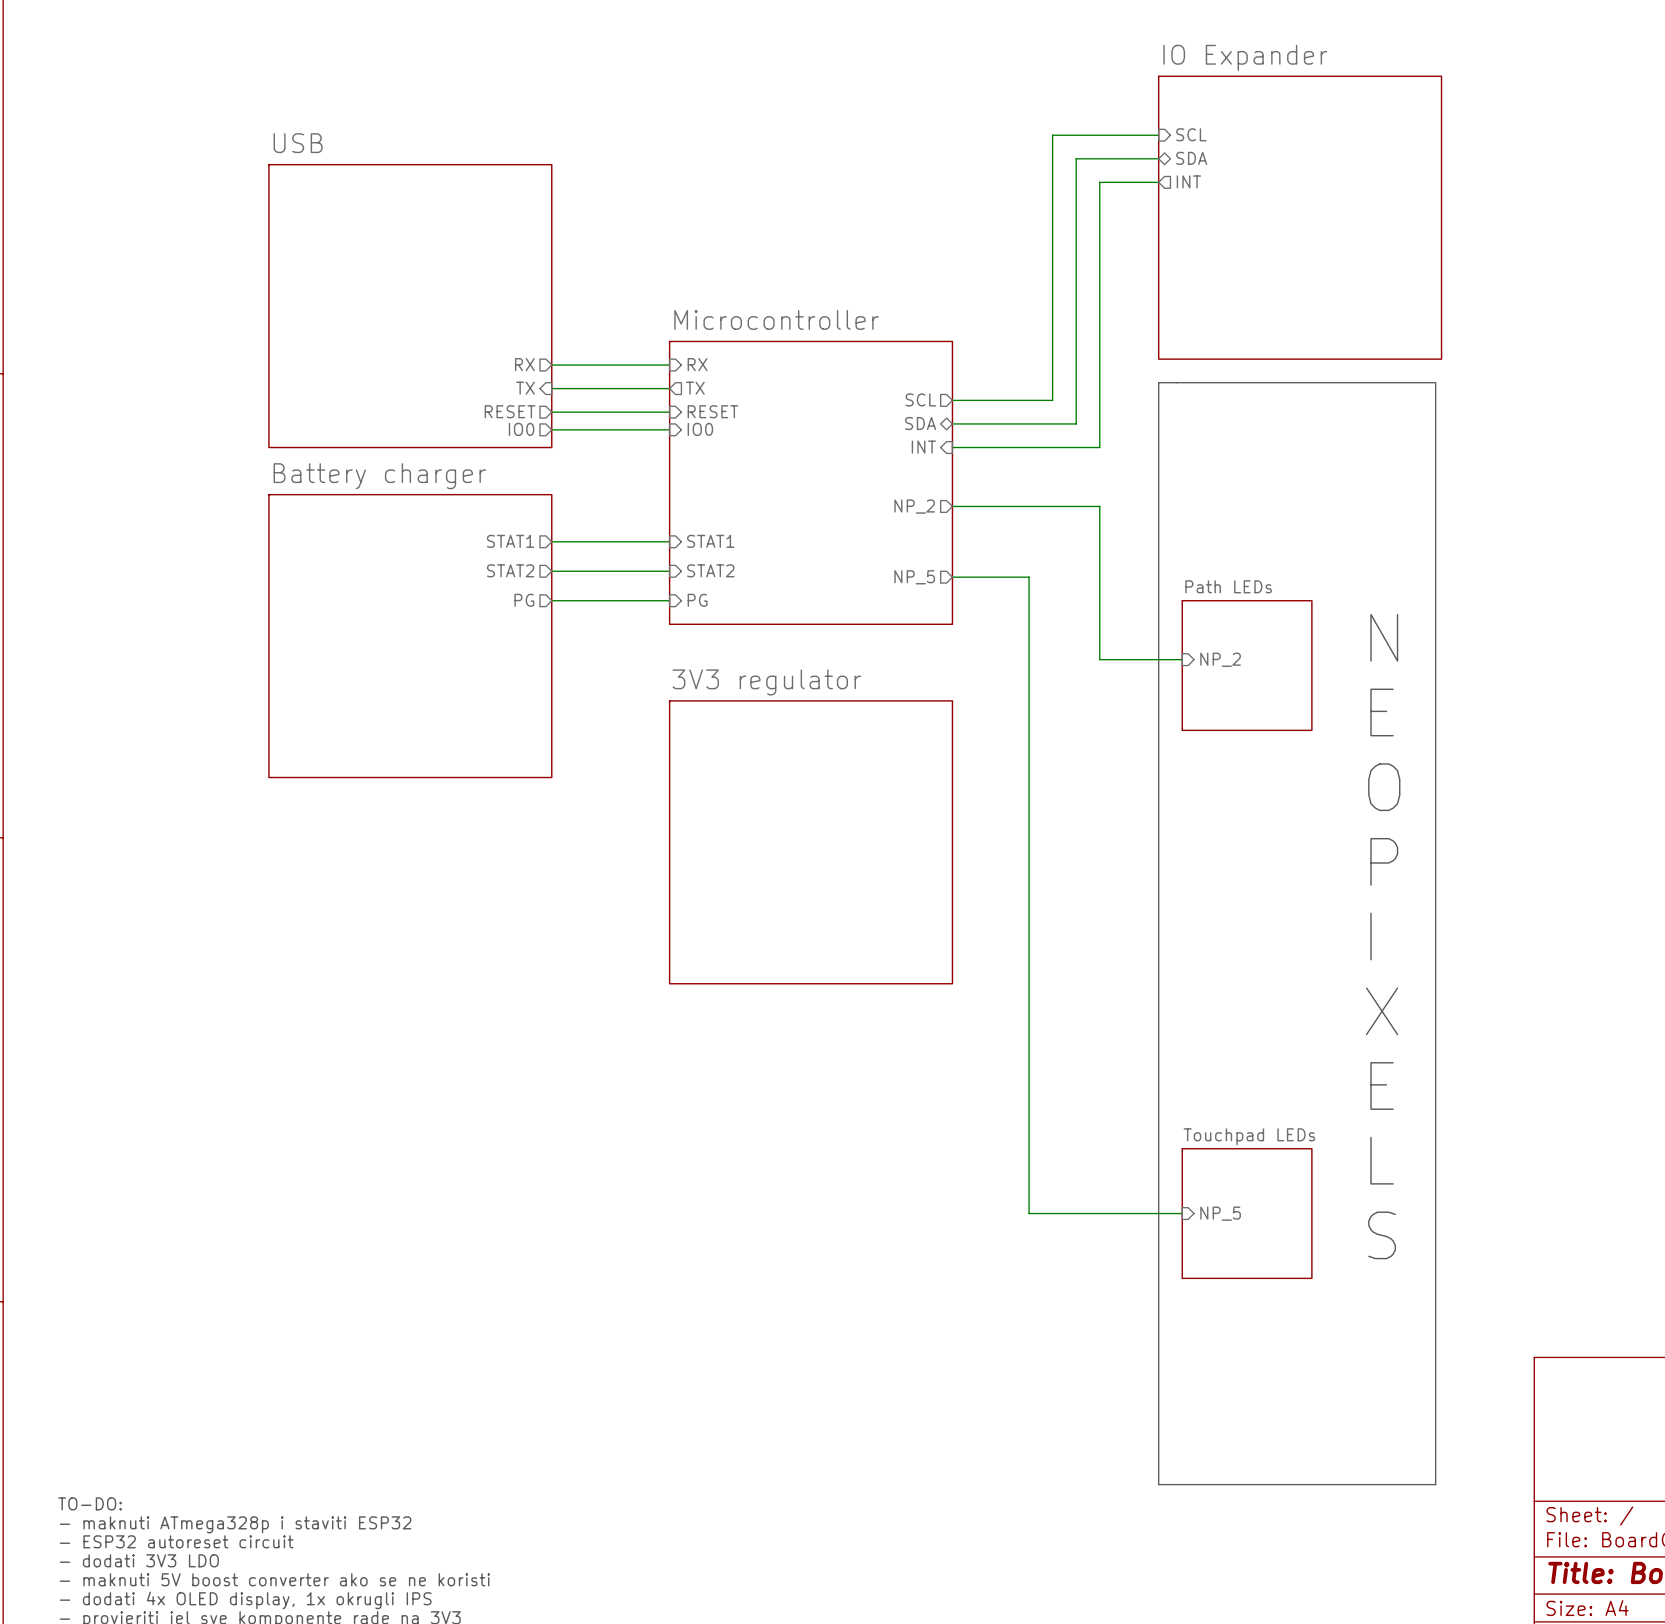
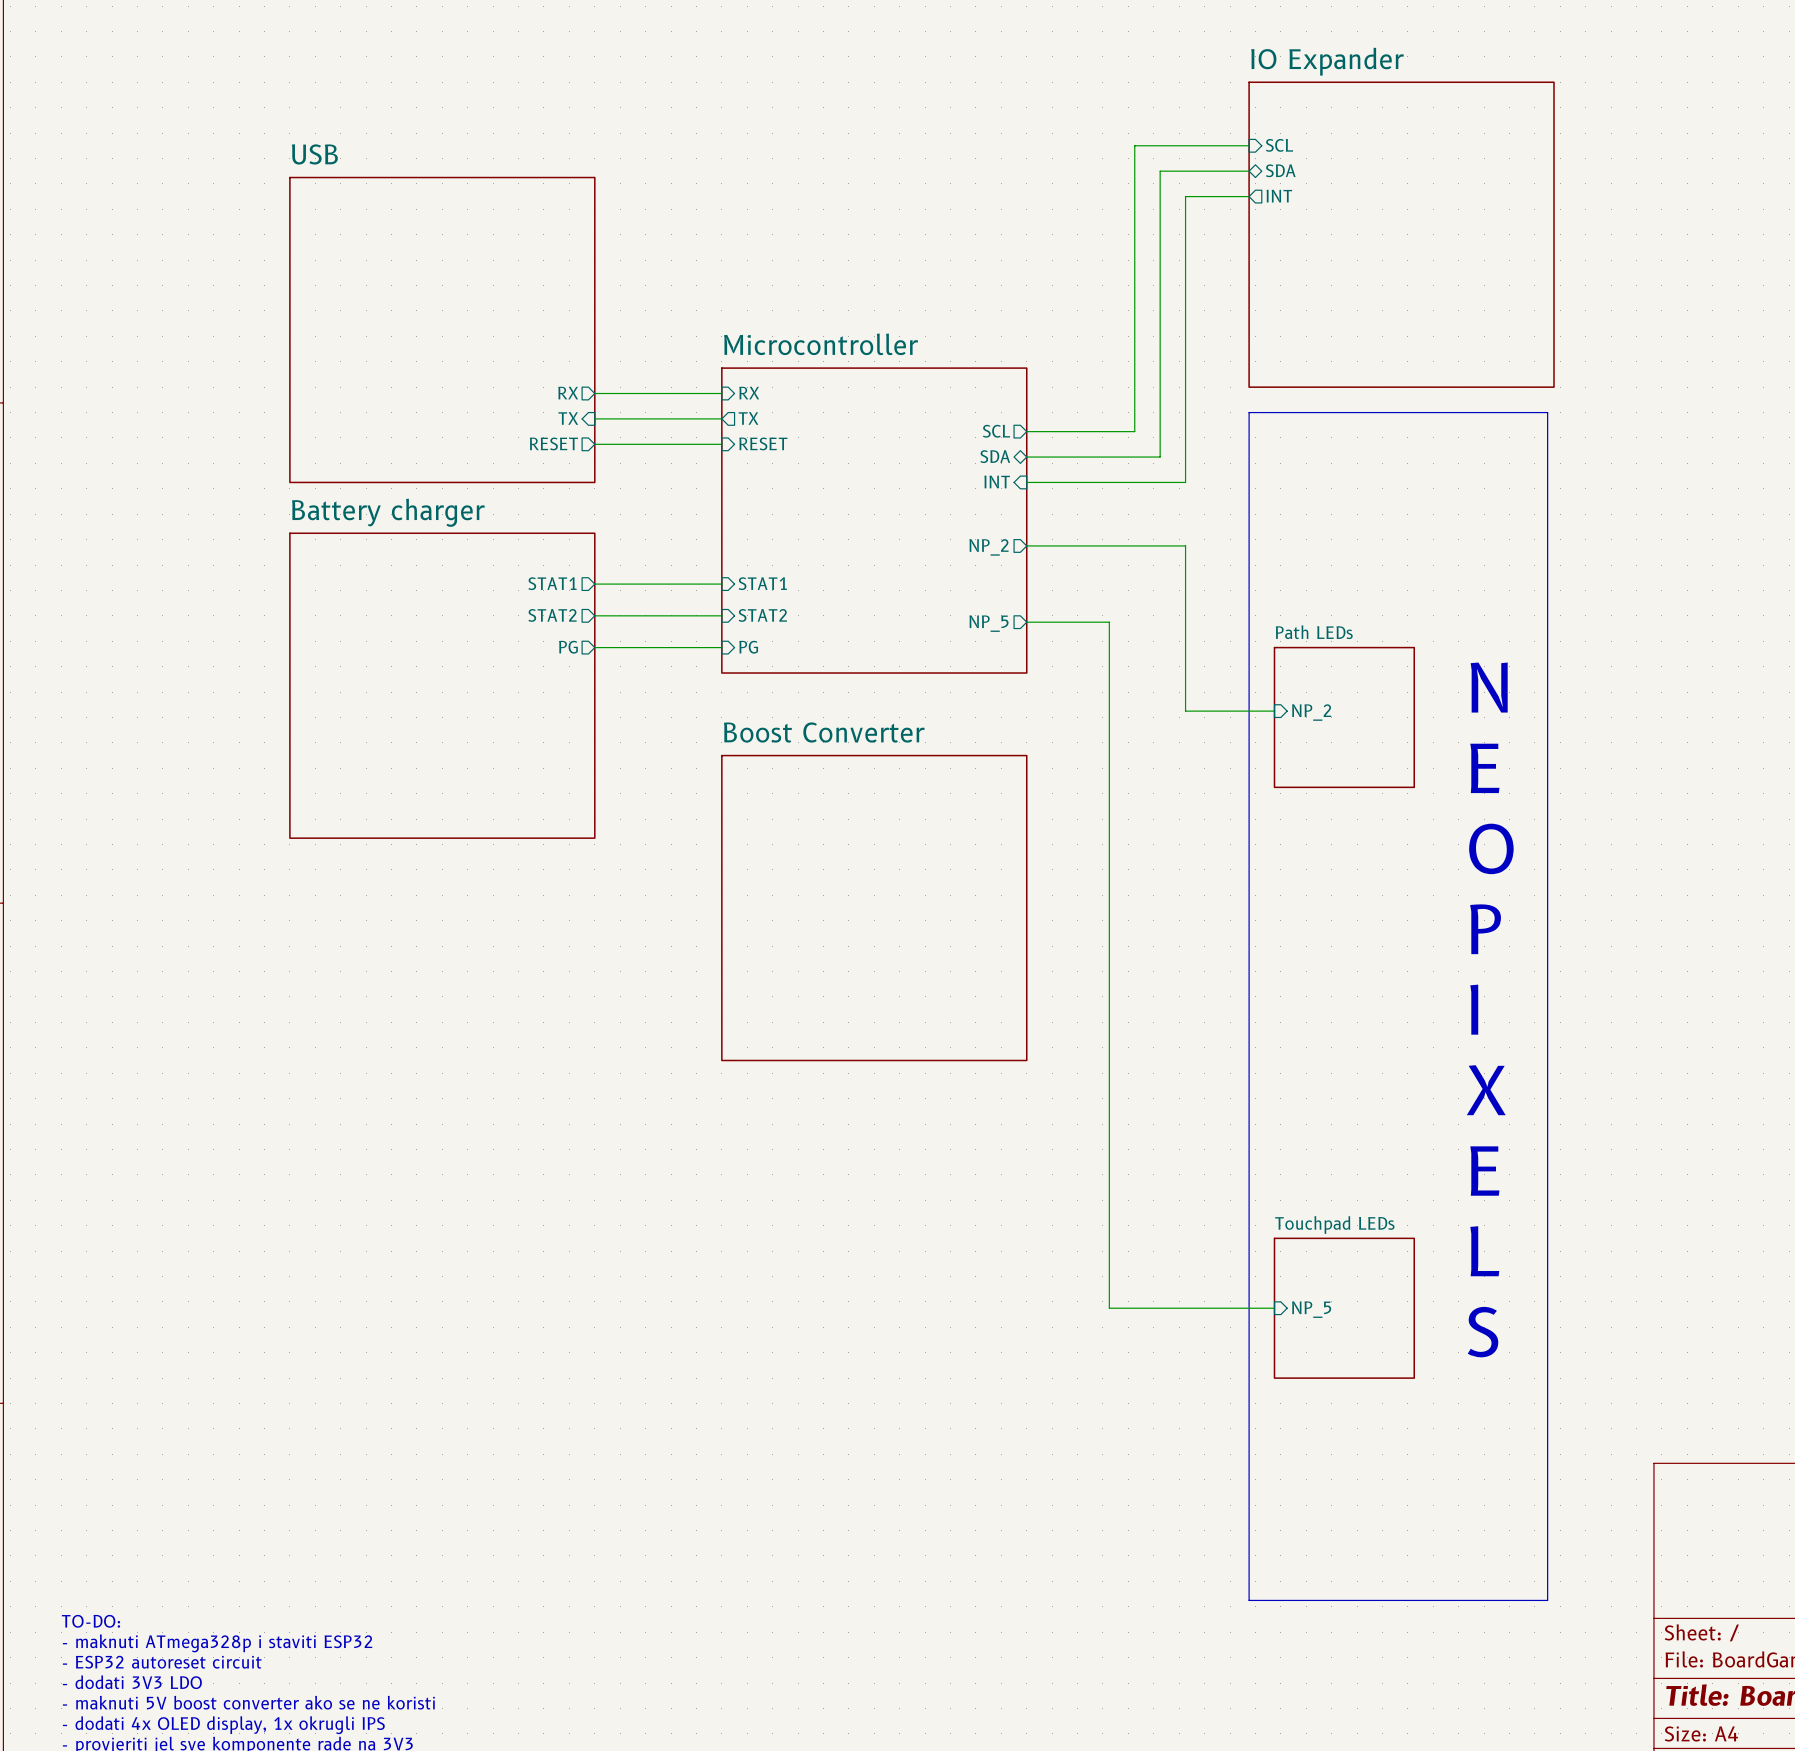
sheet pin: IO0 (521, 429) -> none
wire: (551, 429) (669, 429) -> none
sheet pin: IO0 (700, 429) -> none
sheet 3V3 regulator name: 3V3 regulator (766, 682) -> Boost Converter (824, 732)

